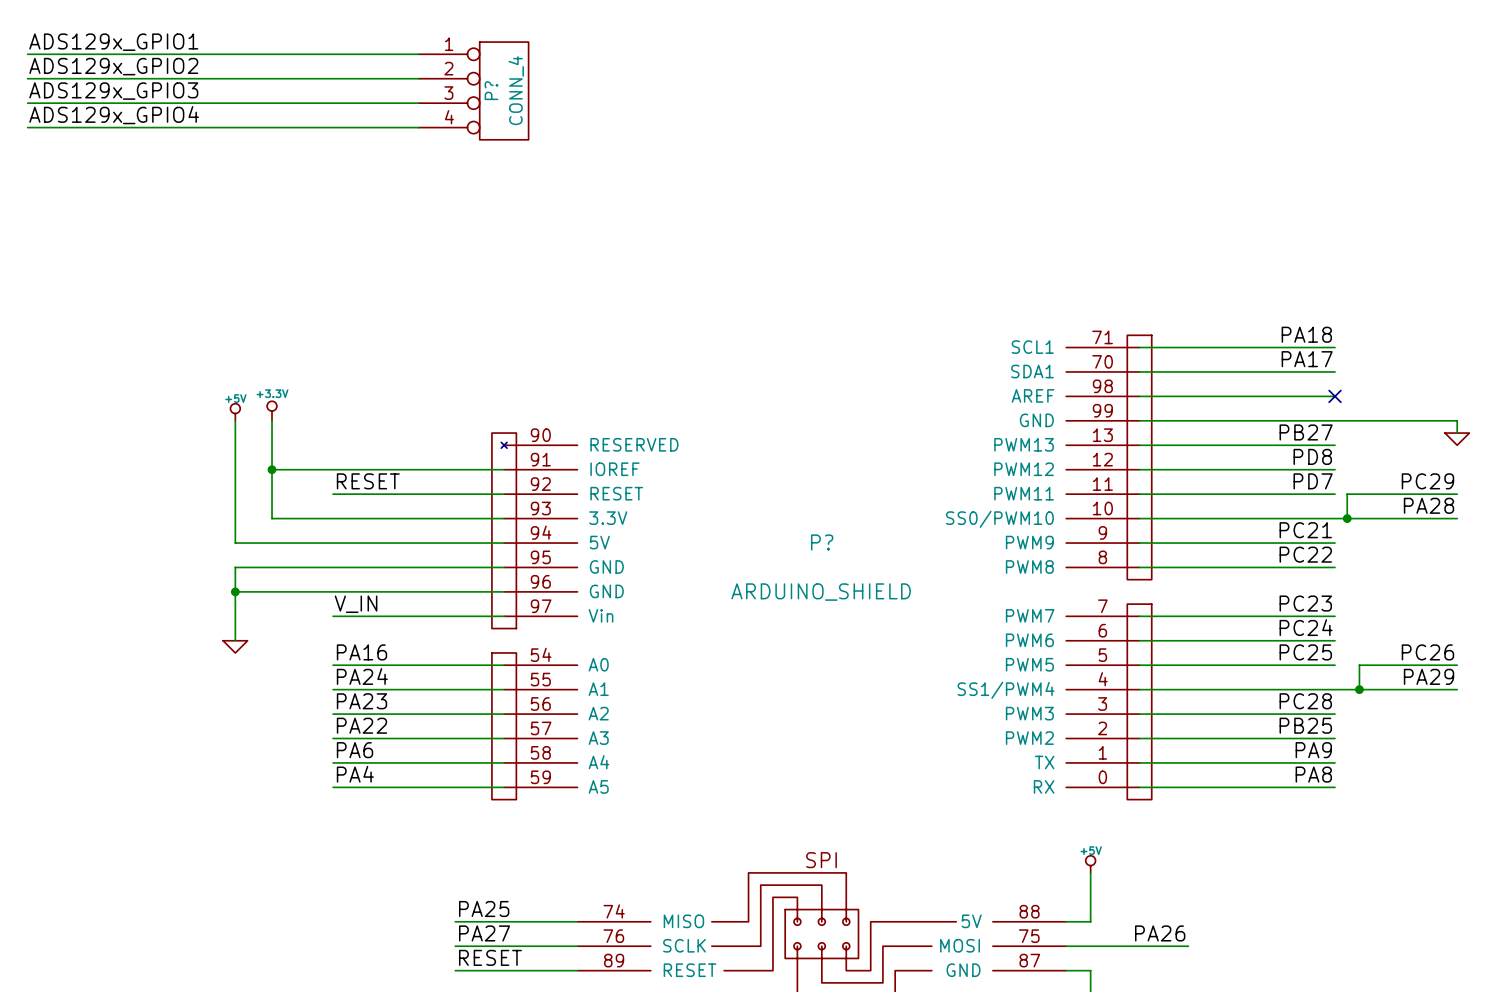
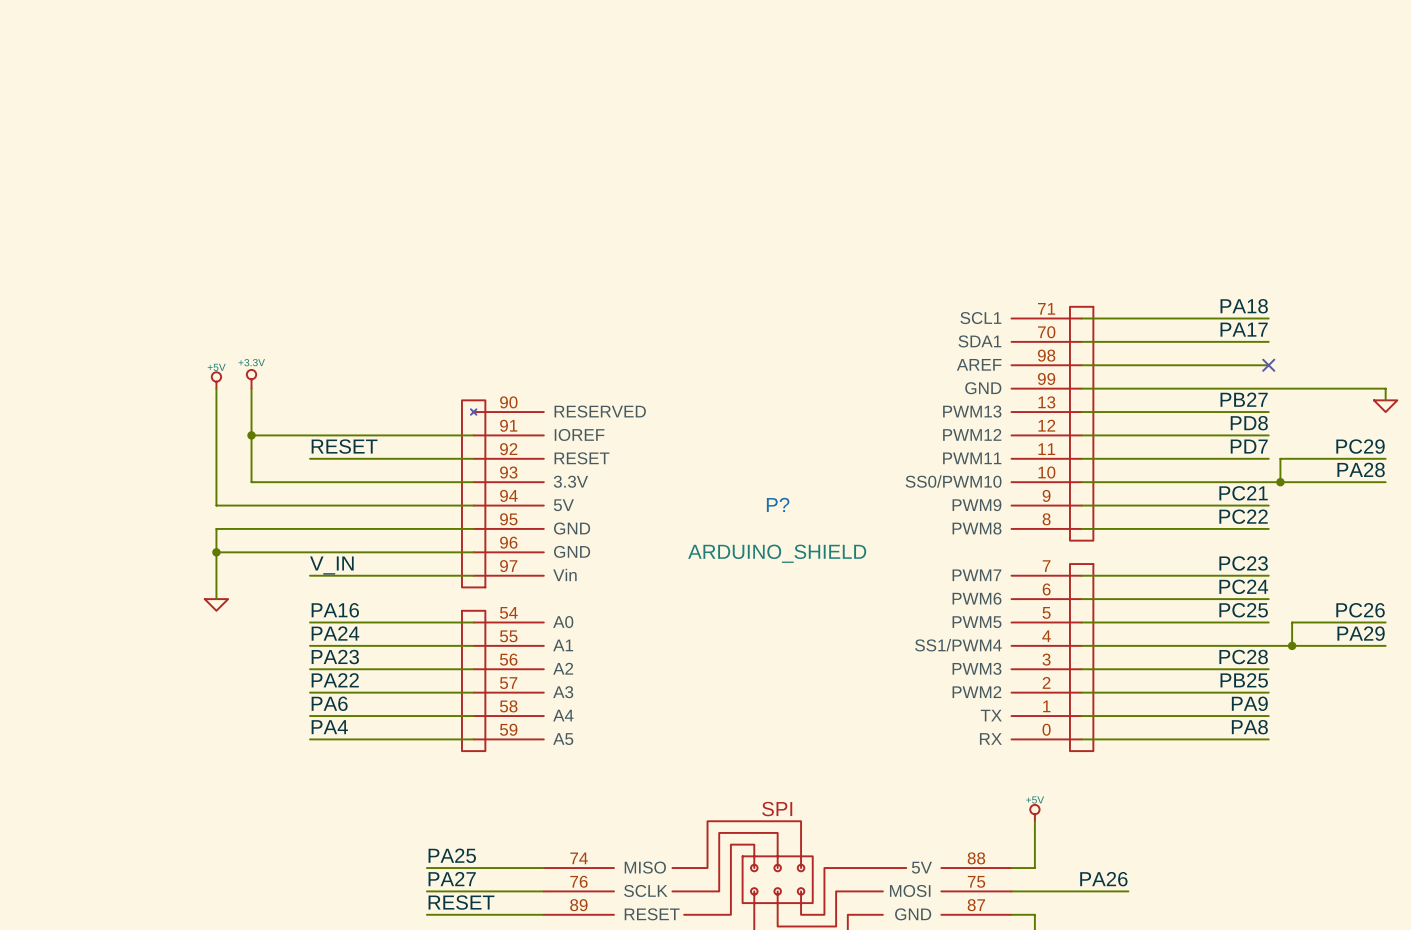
label: ADS129x_GPIO1 (113, 42) -> none
wire: (27, 54) (418, 54) -> none
label: ADS129x_GPIO2 (113, 66) -> none
wire: (27, 78) (418, 78) -> none
P?: CONN_4 (473, 90) -> none
label: ADS129x_GPIO3 (113, 91) -> none
wire: (27, 103) (418, 103) -> none
label: ADS129x_GPIO4 (114, 115) -> none
wire: (27, 127) (418, 127) -> none

